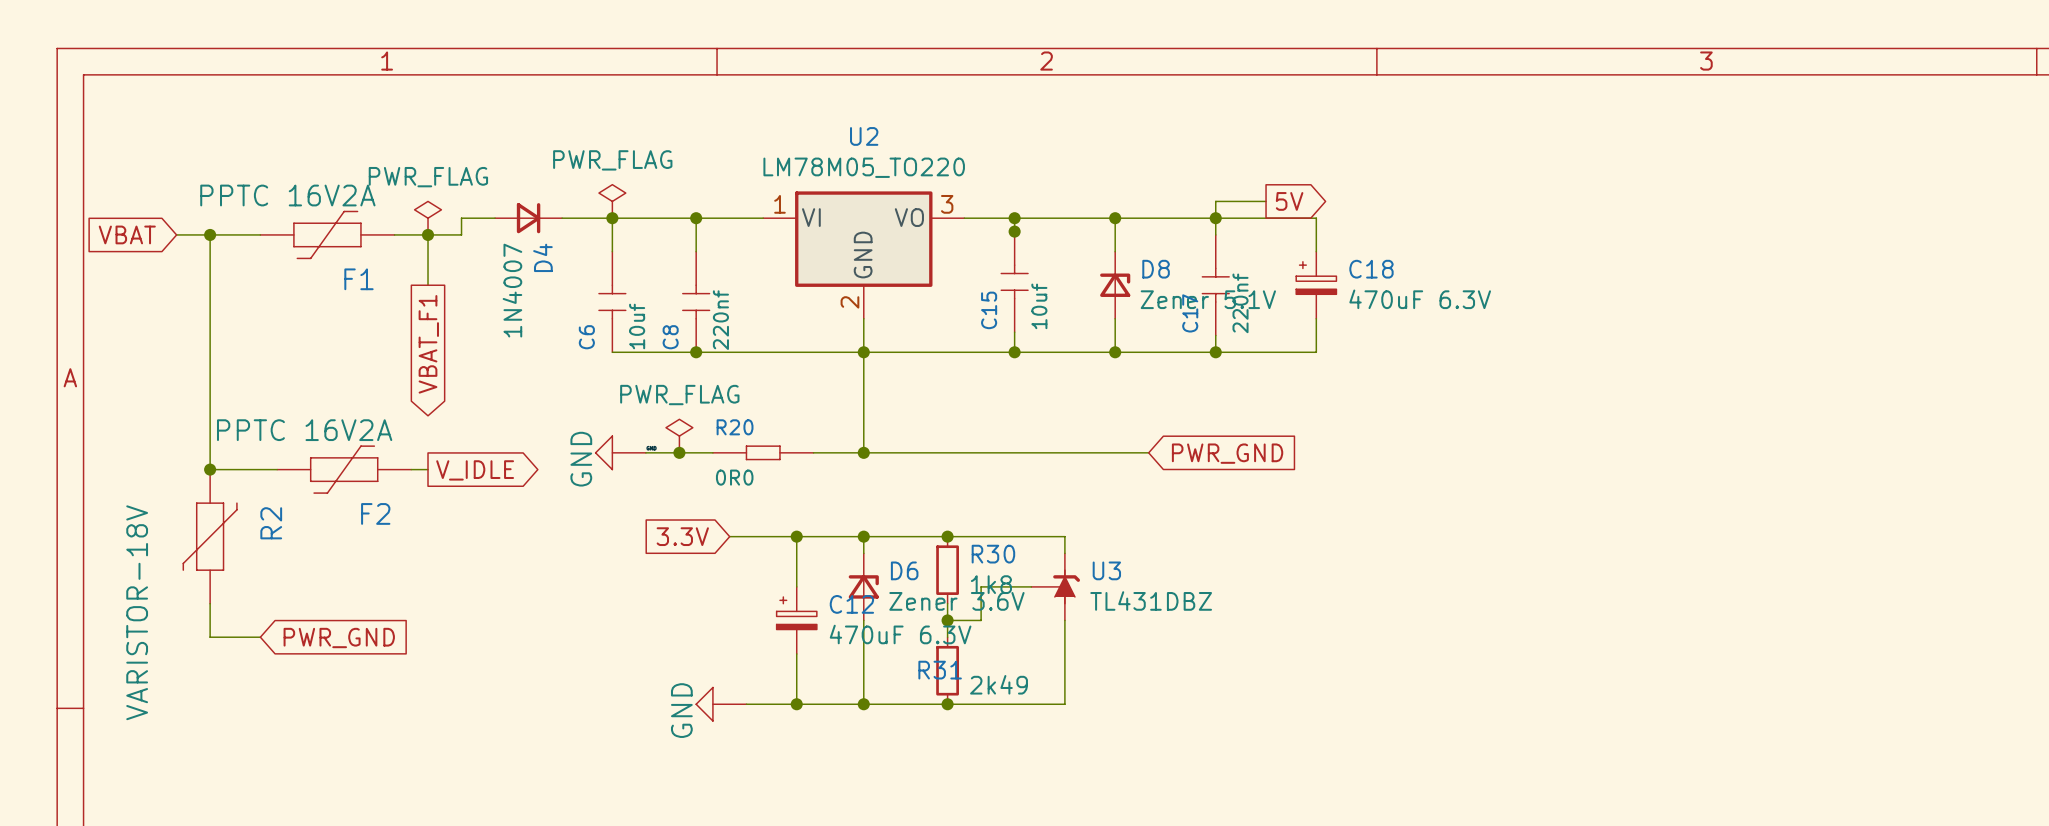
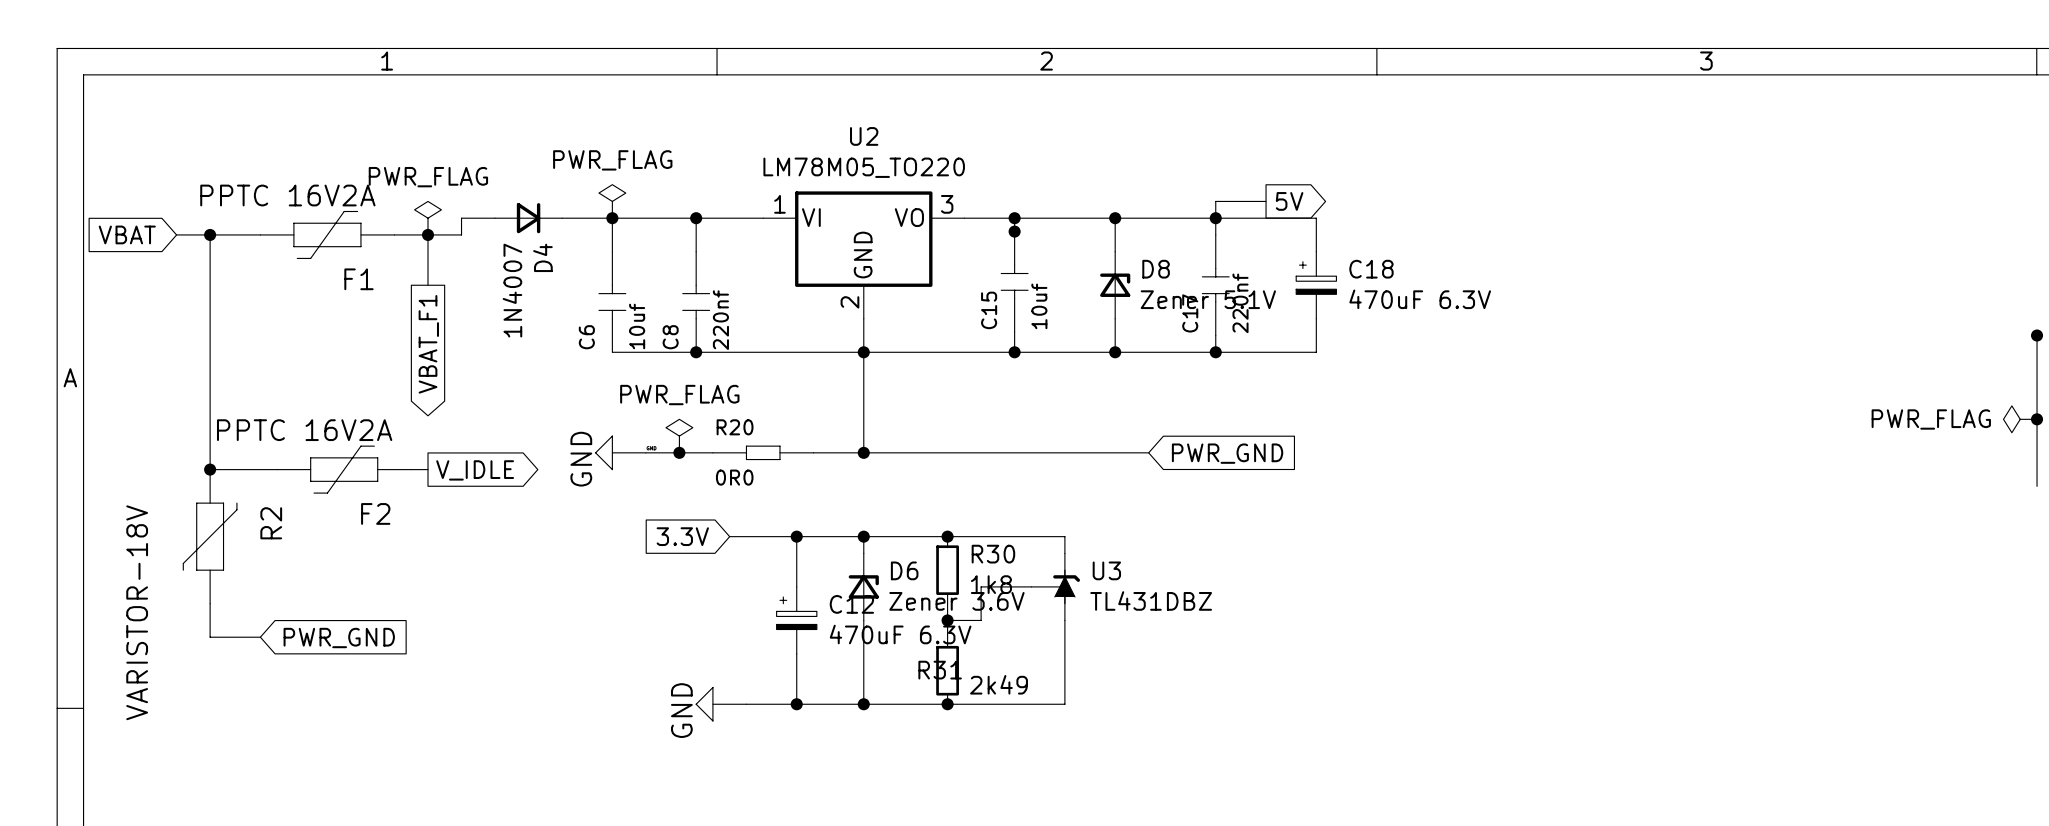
wire: none -> (2037, 335) (2037, 486)
junction: none -> (2037, 335)
power symbol: none -> PWR_FLAG (2020, 419)
junction: none -> (2037, 419)

